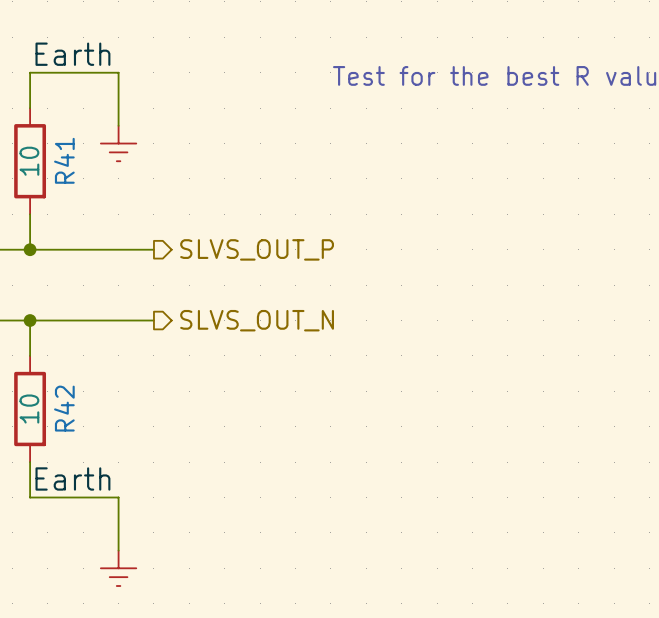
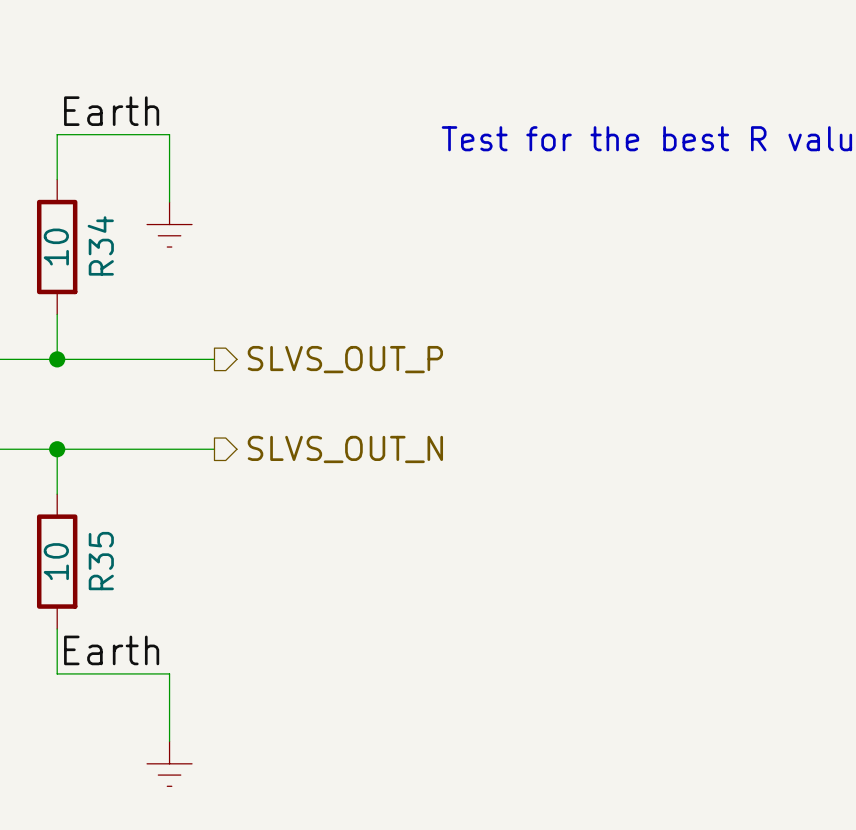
R41 name: R41 (64, 160) -> R34 (100, 245)
R42 name: R42 (64, 408) -> R35 (101, 561)

